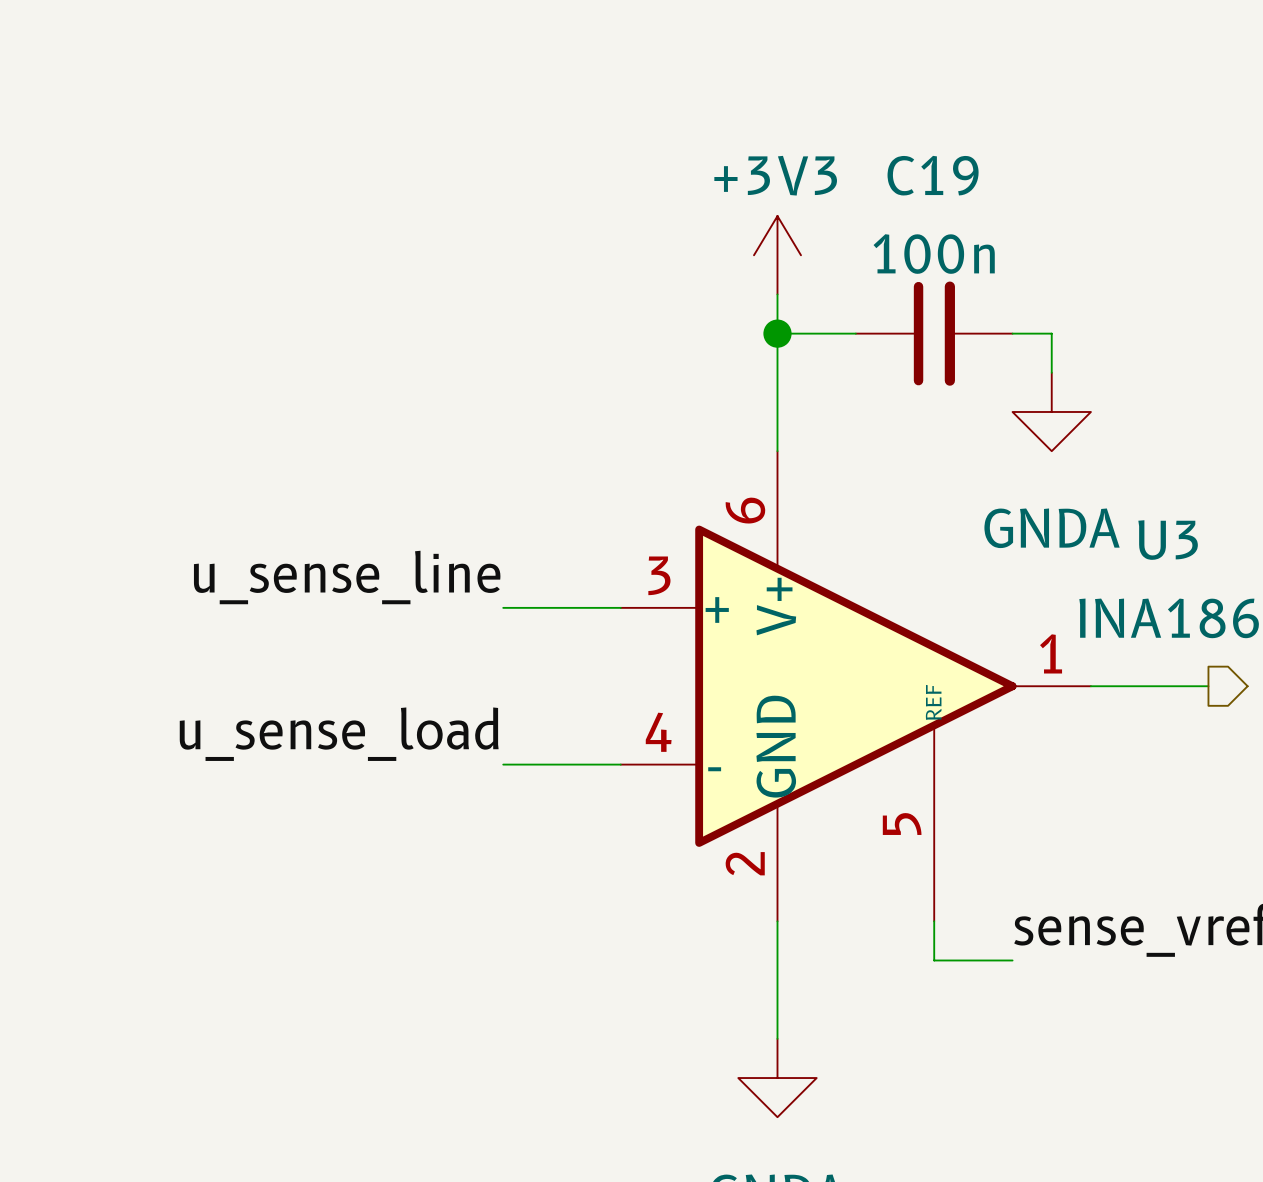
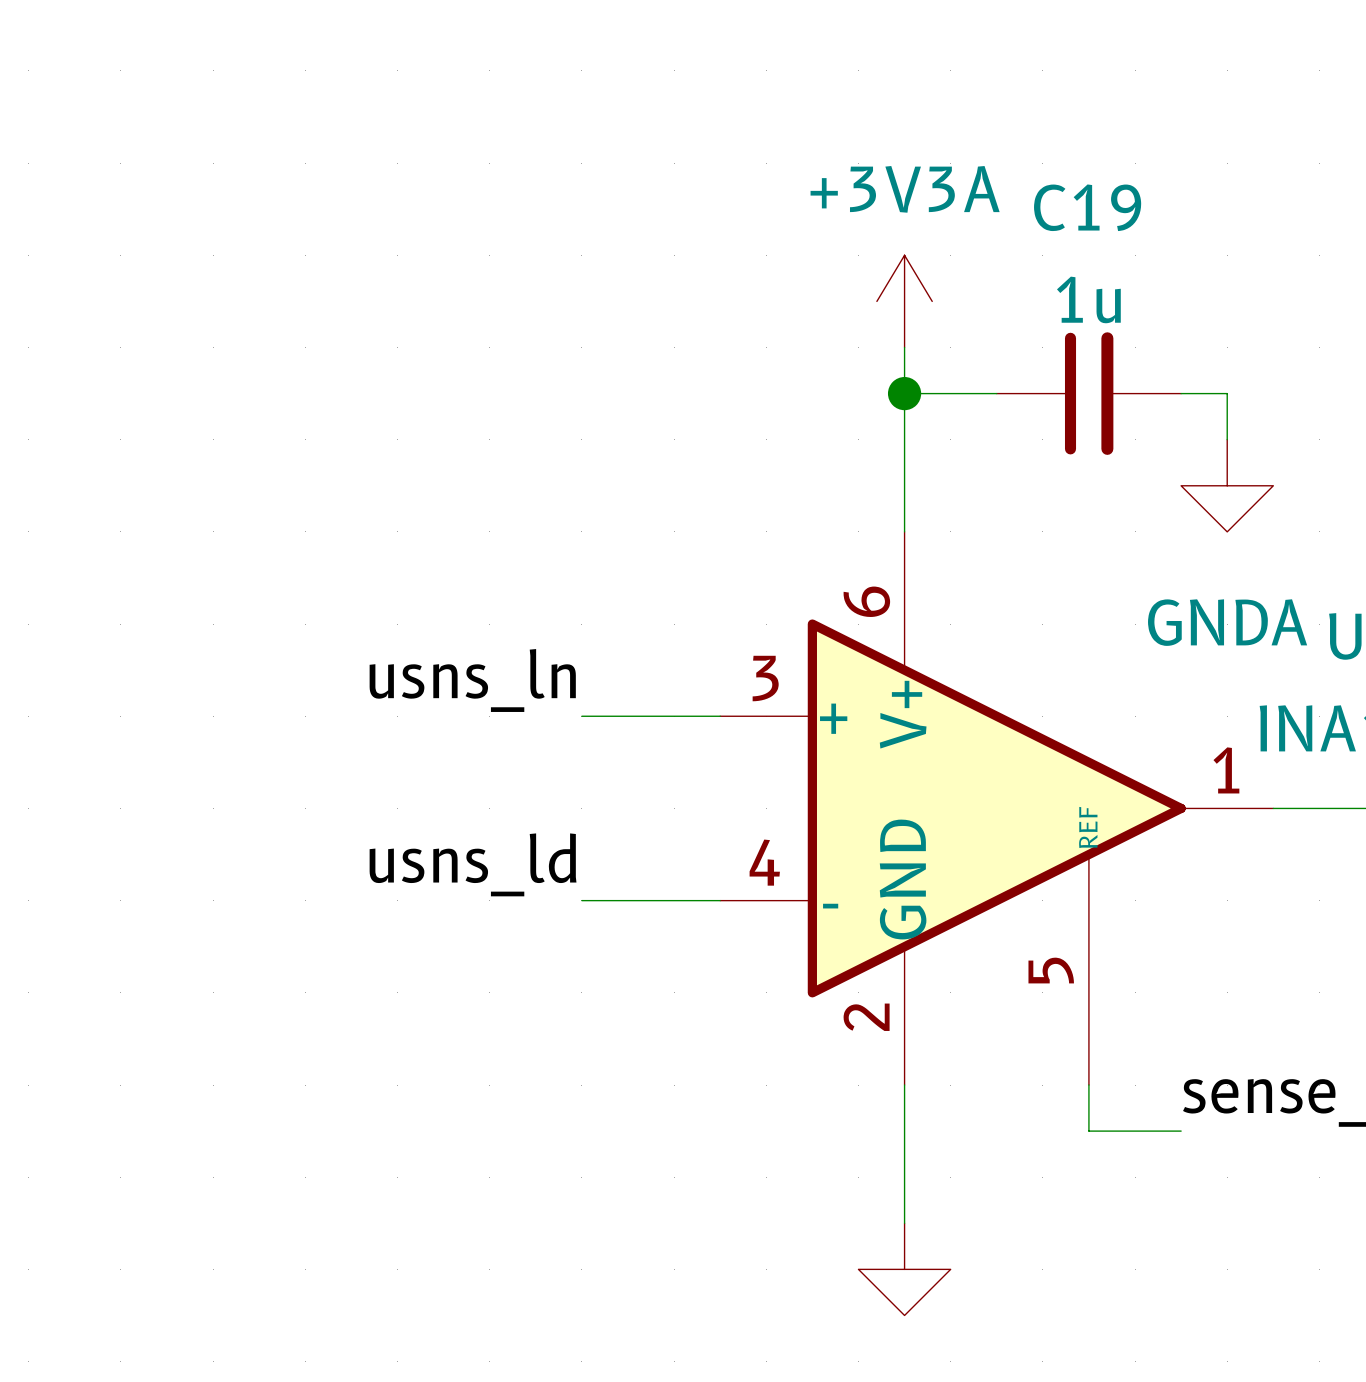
C19 value: 100n (934, 254) -> 1u (1088, 299)
power symbol: +3V3 (777, 255) -> +3V3A (904, 301)
label: u_sense_line (347, 577) -> usns_ln (472, 680)
label: u_sense_load (339, 734) -> usns_ld (473, 864)

